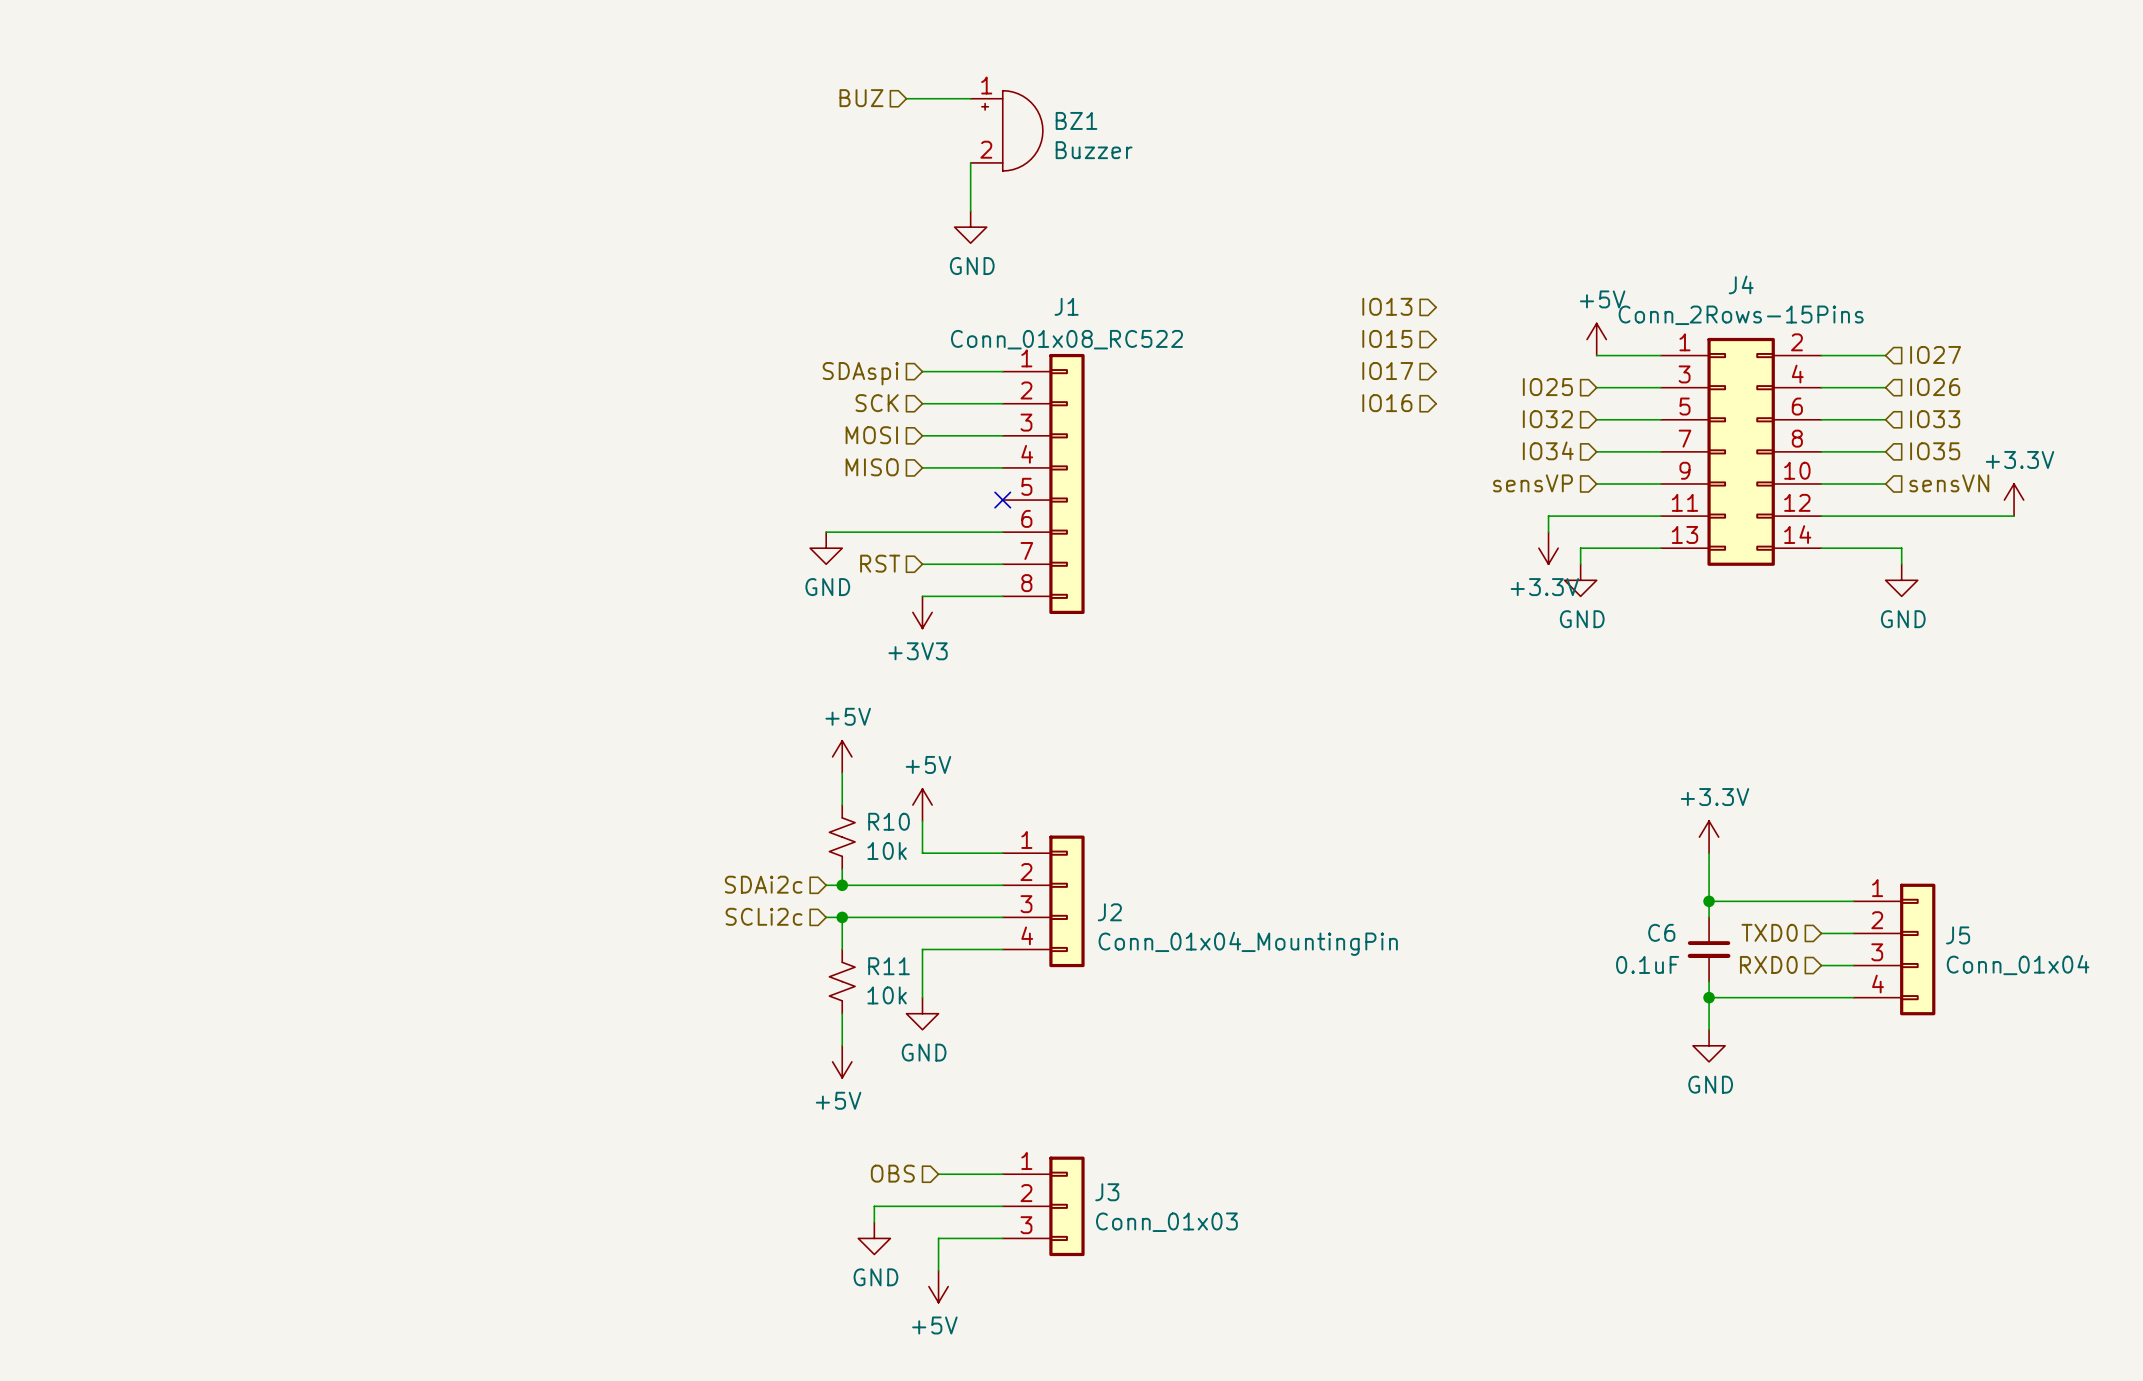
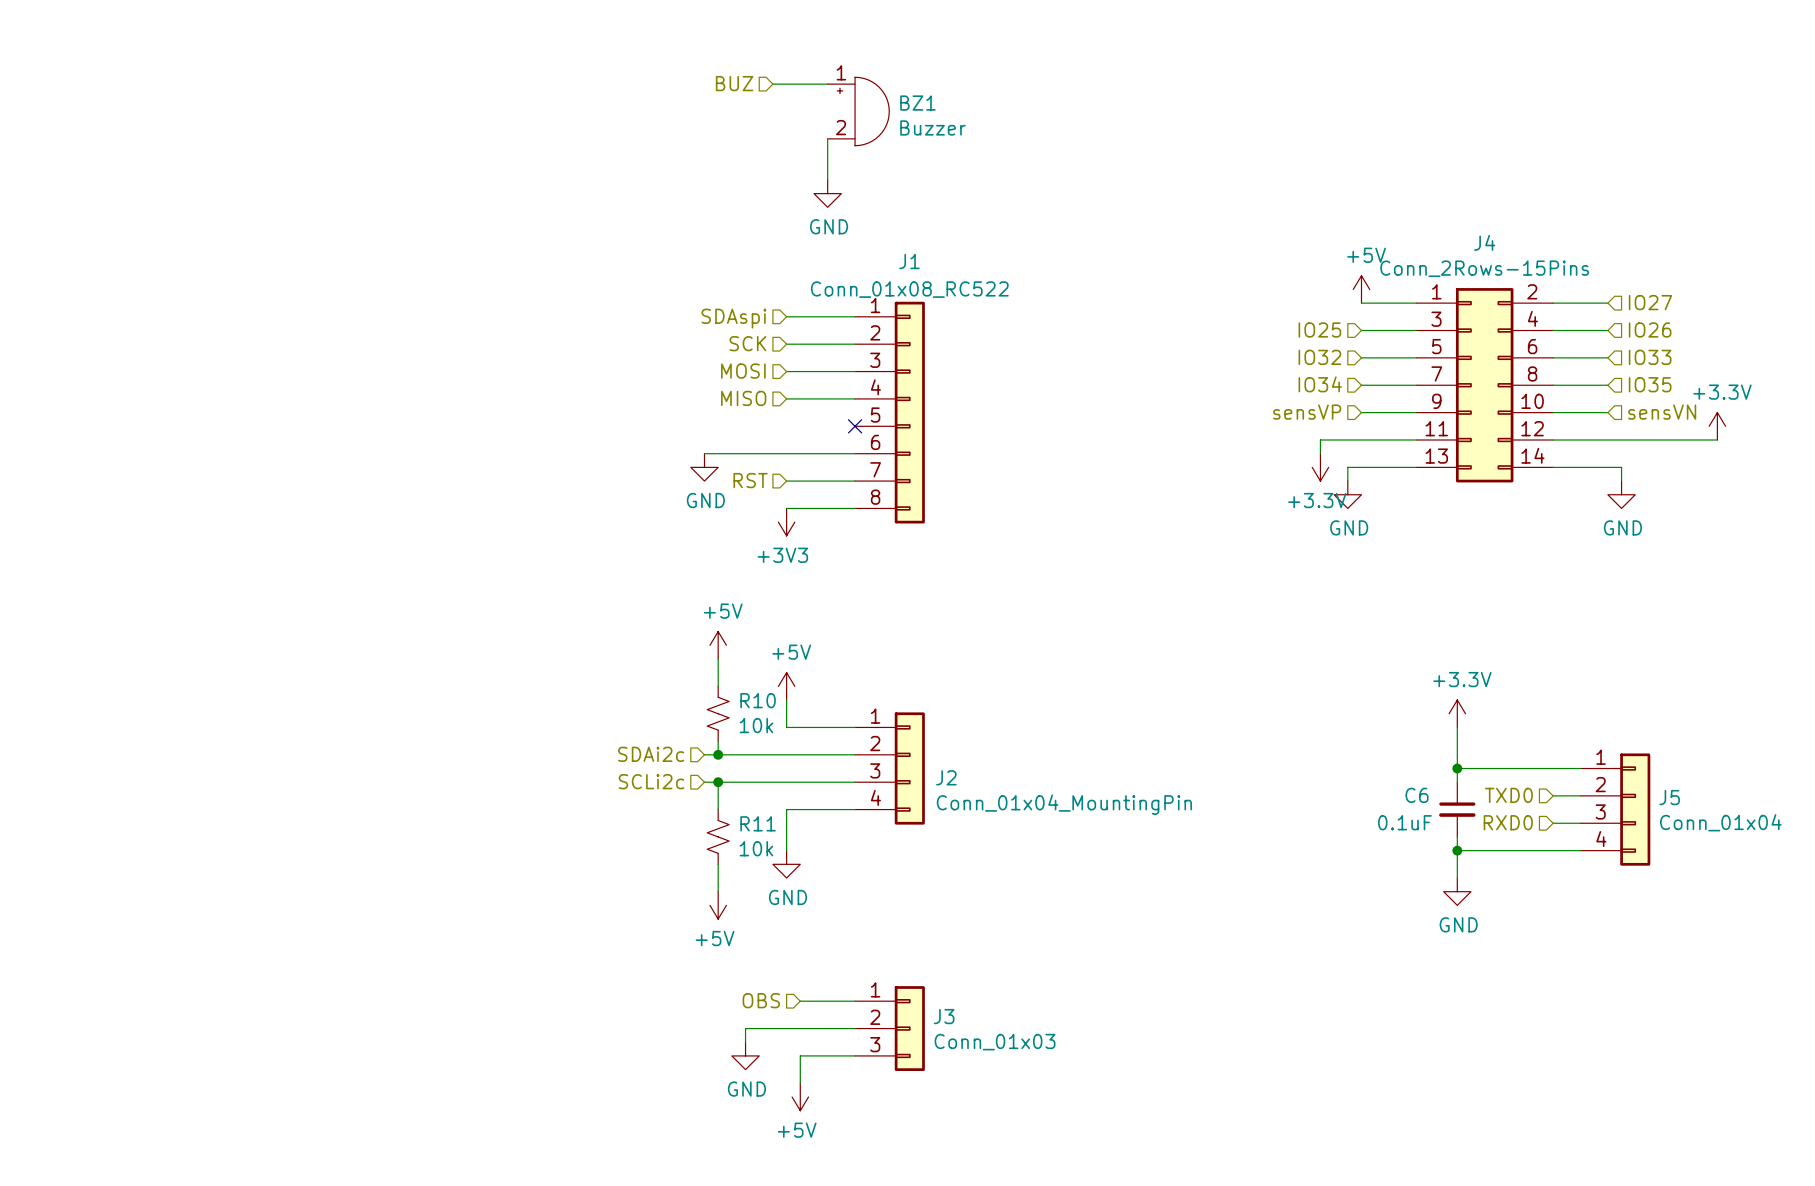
hierarchical label: IO13 (1387, 306) -> none
hierarchical label: IO15 (1387, 338) -> none
hierarchical label: IO17 (1387, 371) -> none
hierarchical label: IO16 (1387, 403) -> none

